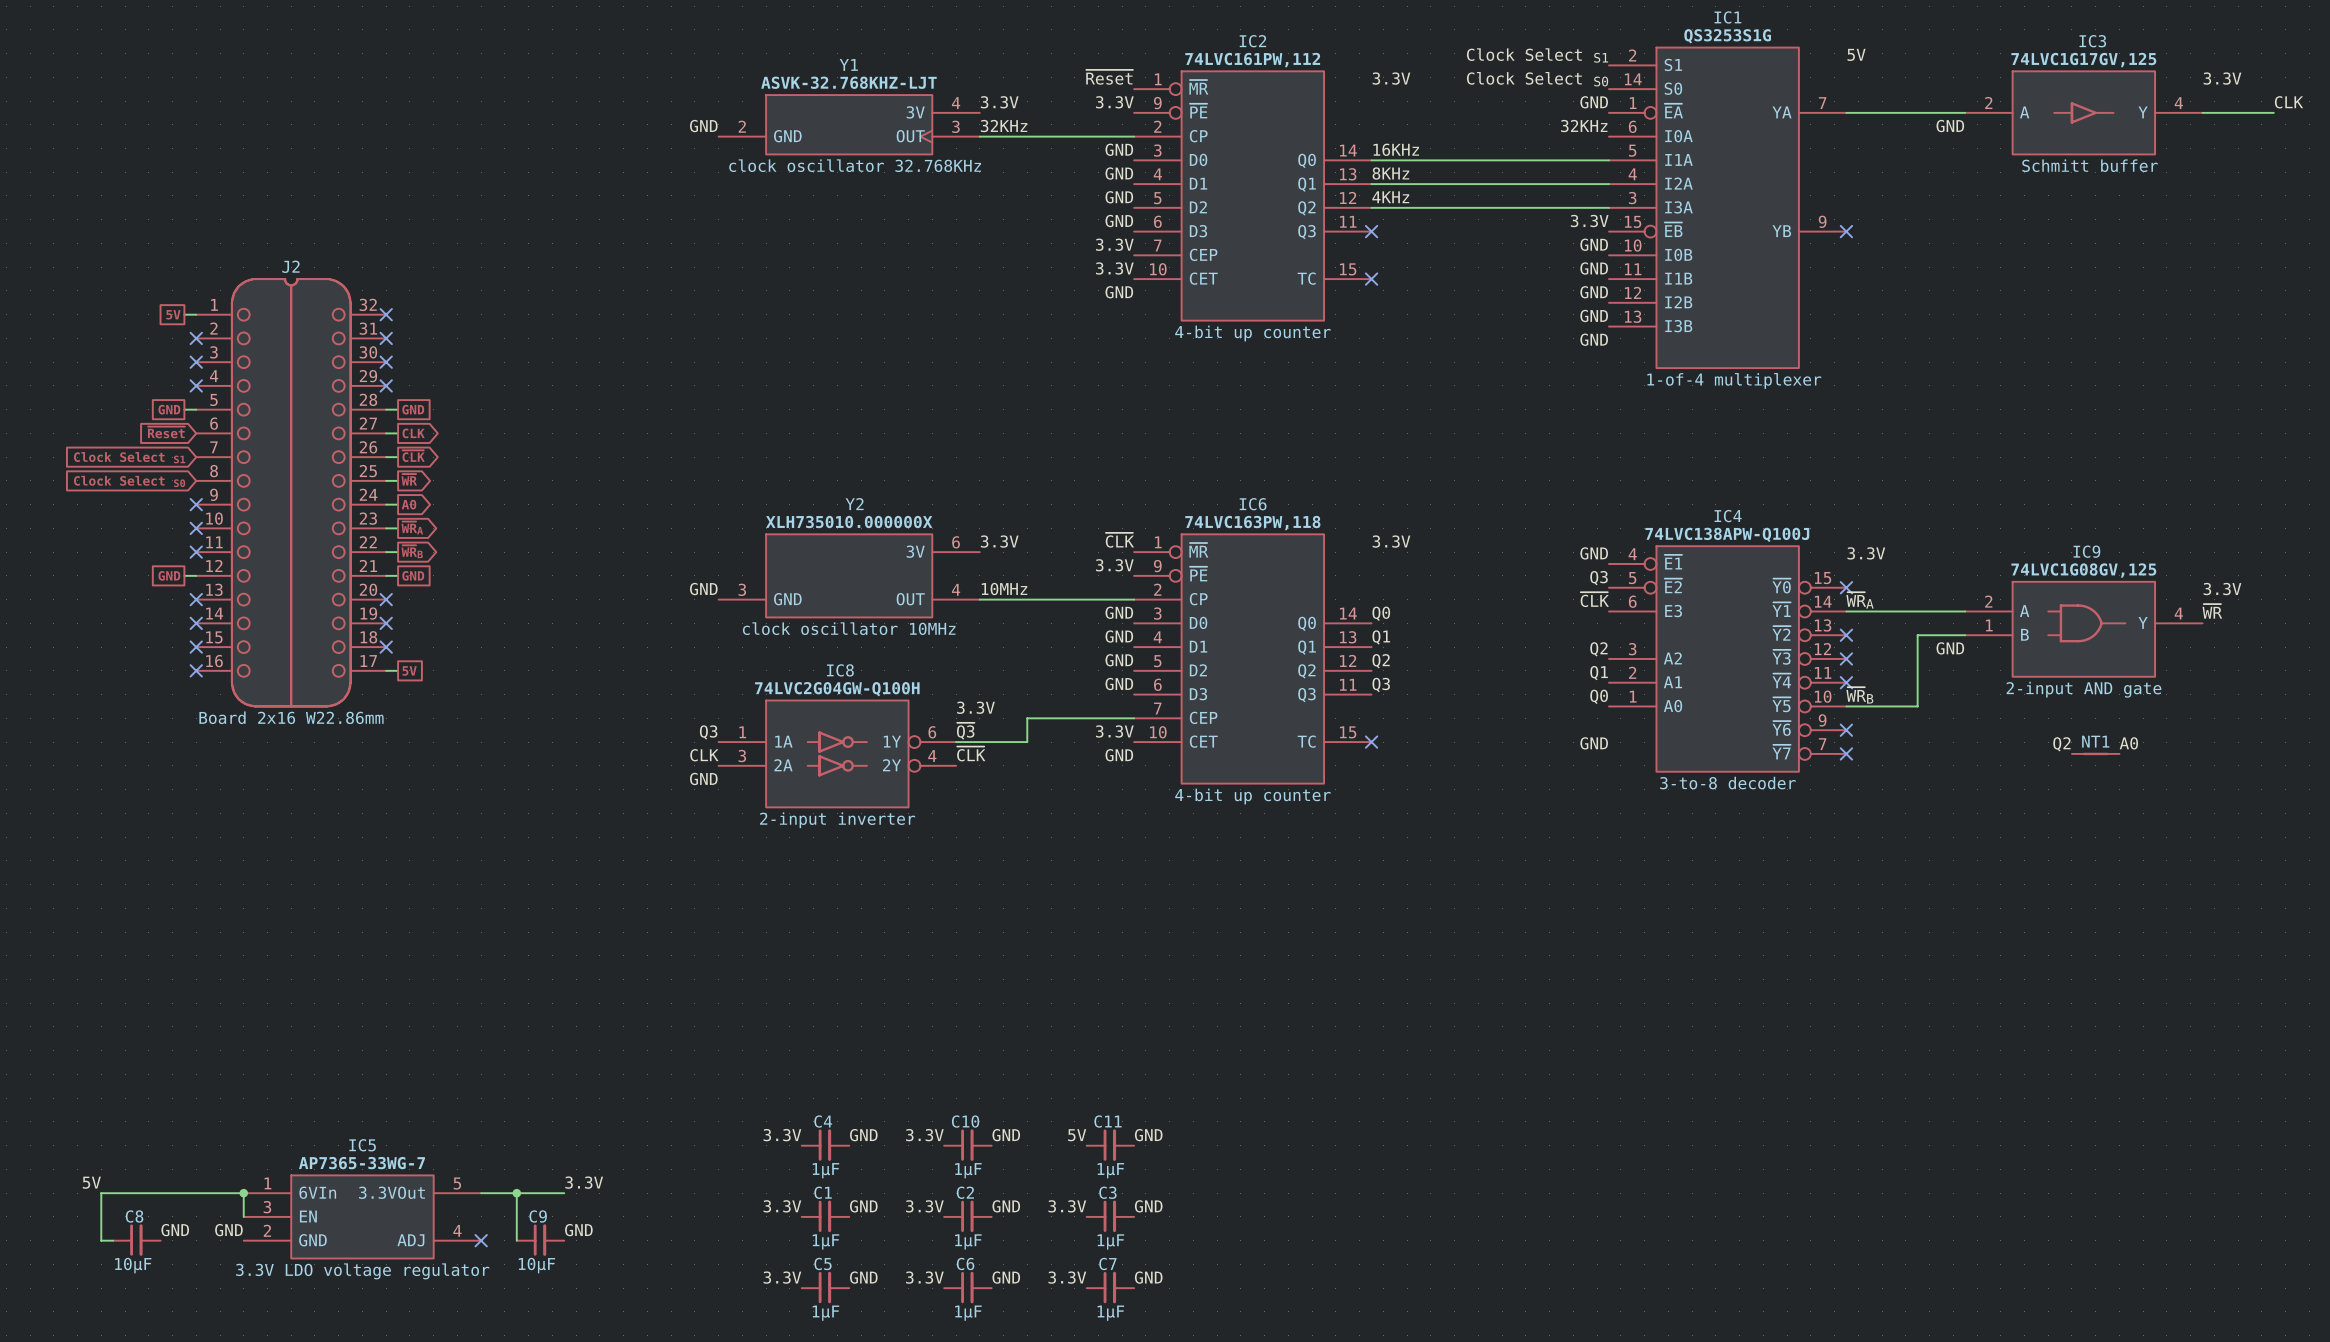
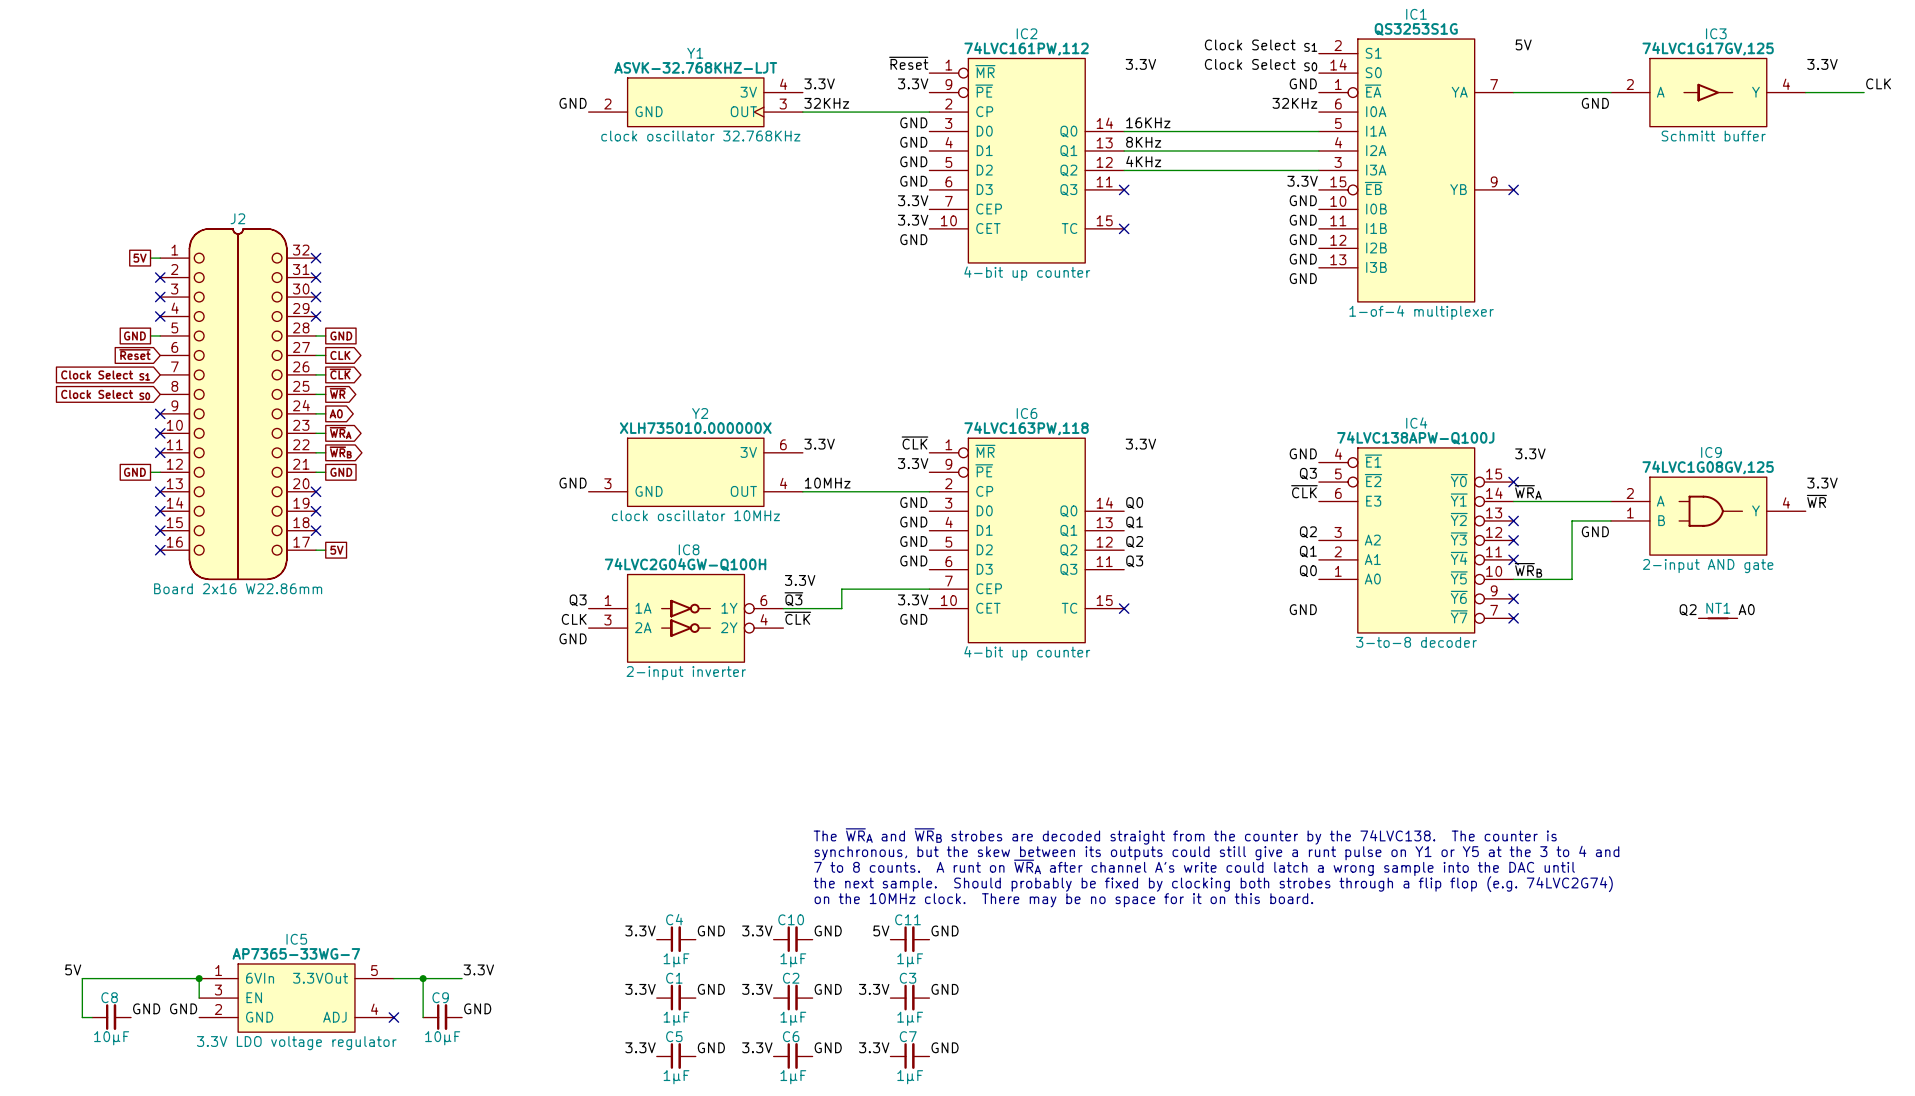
text: none -> The ~{WR}A and ~{WR}B strobes are decoded straight from the counter by the 74LVC138. The counter is (1185, 836)
text: none -> synchronous, but the skew between its outputs could still give a runt pulse on Y1 or Y5 at the 3 to 4 and (1216, 853)
text: none -> 7 to 8 counts. A runt on ~{WR}A after channel A's write could latch a wrong sample into the DAC until (1194, 867)
text: none -> the next sample. Should probably be fixed by clocking both strobes through a flip flop (e.g. 74LVC2G74) (1213, 884)
text: none -> on the 10MHz clock. There may be no space for it on this board. (1063, 900)

